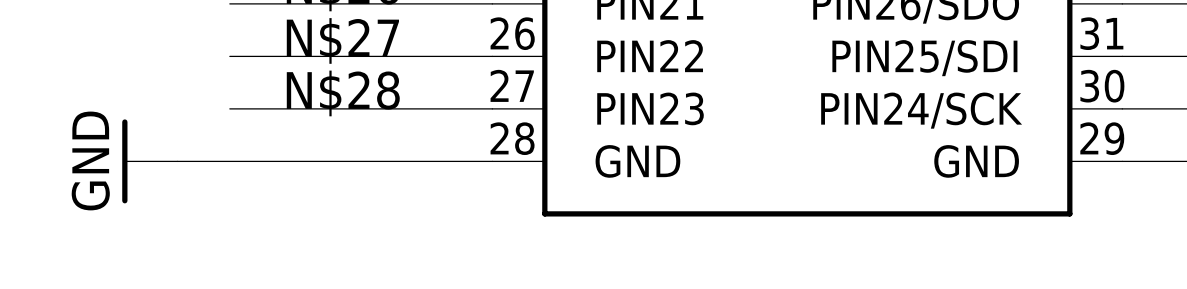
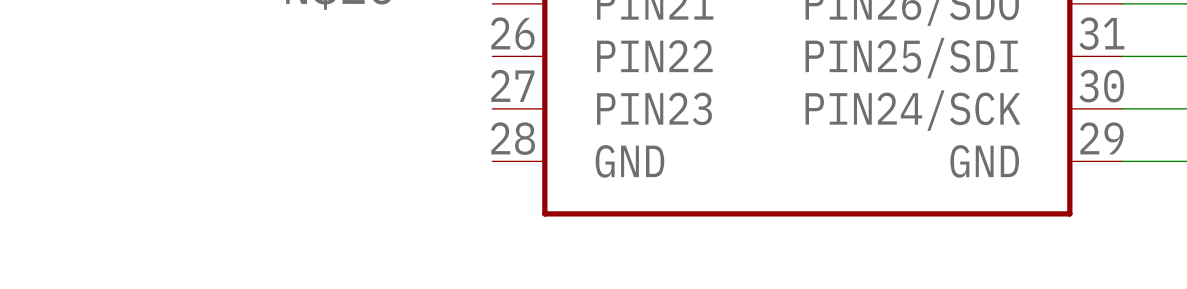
wire: (229, 3) (492, 3) -> none
label: N$27 (342, 40) -> none
wire: (229, 56) (492, 56) -> none
label: N$28 (343, 93) -> none
wire: (229, 108) (492, 108) -> none
power symbol: GND (149, 161) -> none
wire: (177, 161) (492, 161) -> none

